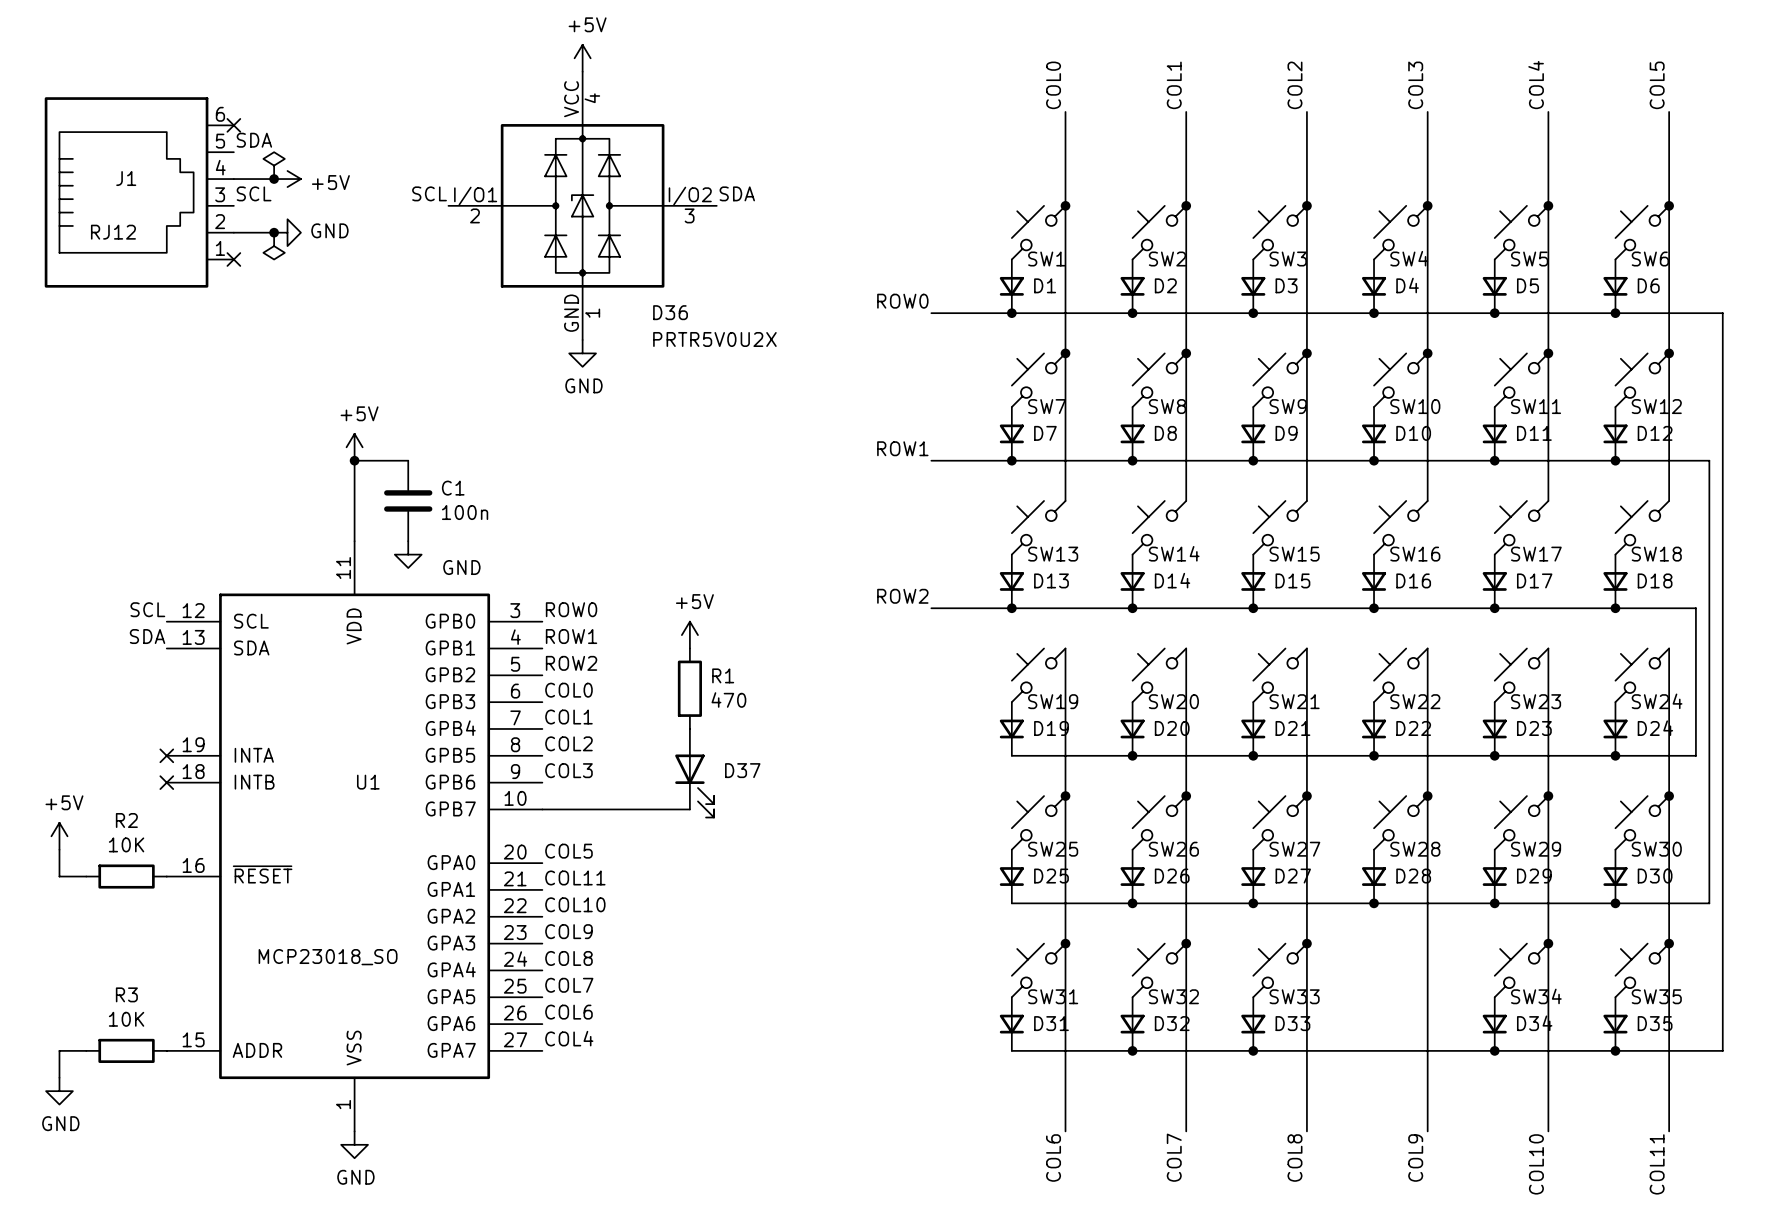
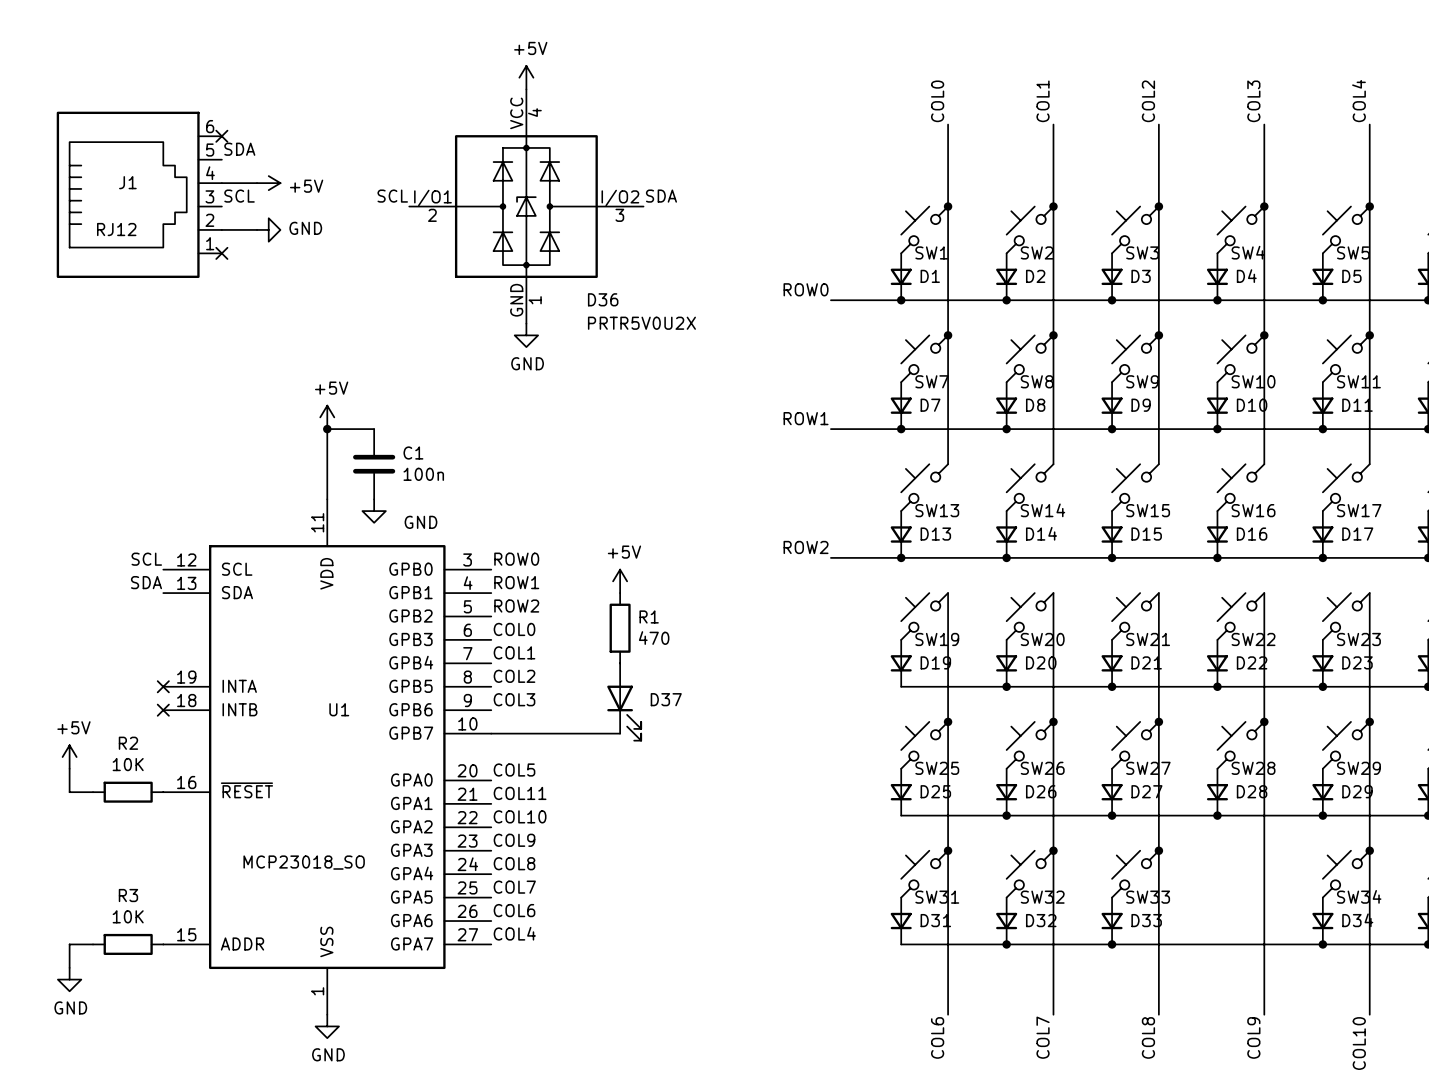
power symbol: (274, 165) -> none
junction: (274, 179) -> none
junction: (274, 232) -> none
power symbol: (274, 246) -> none

